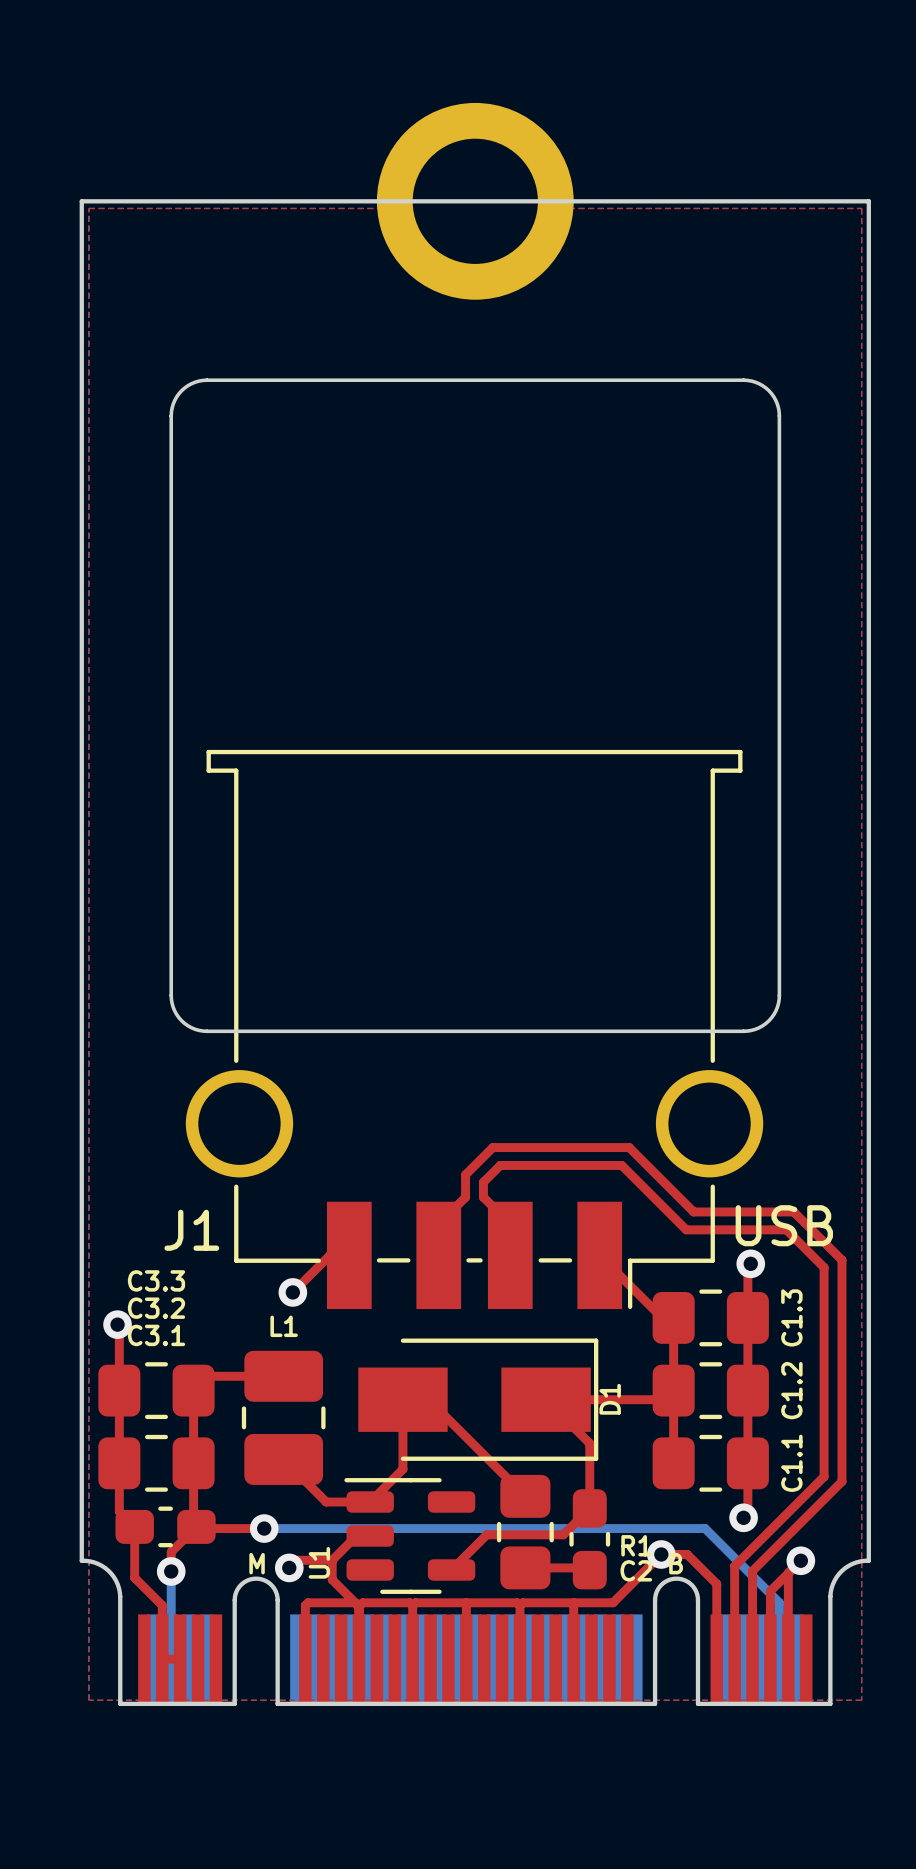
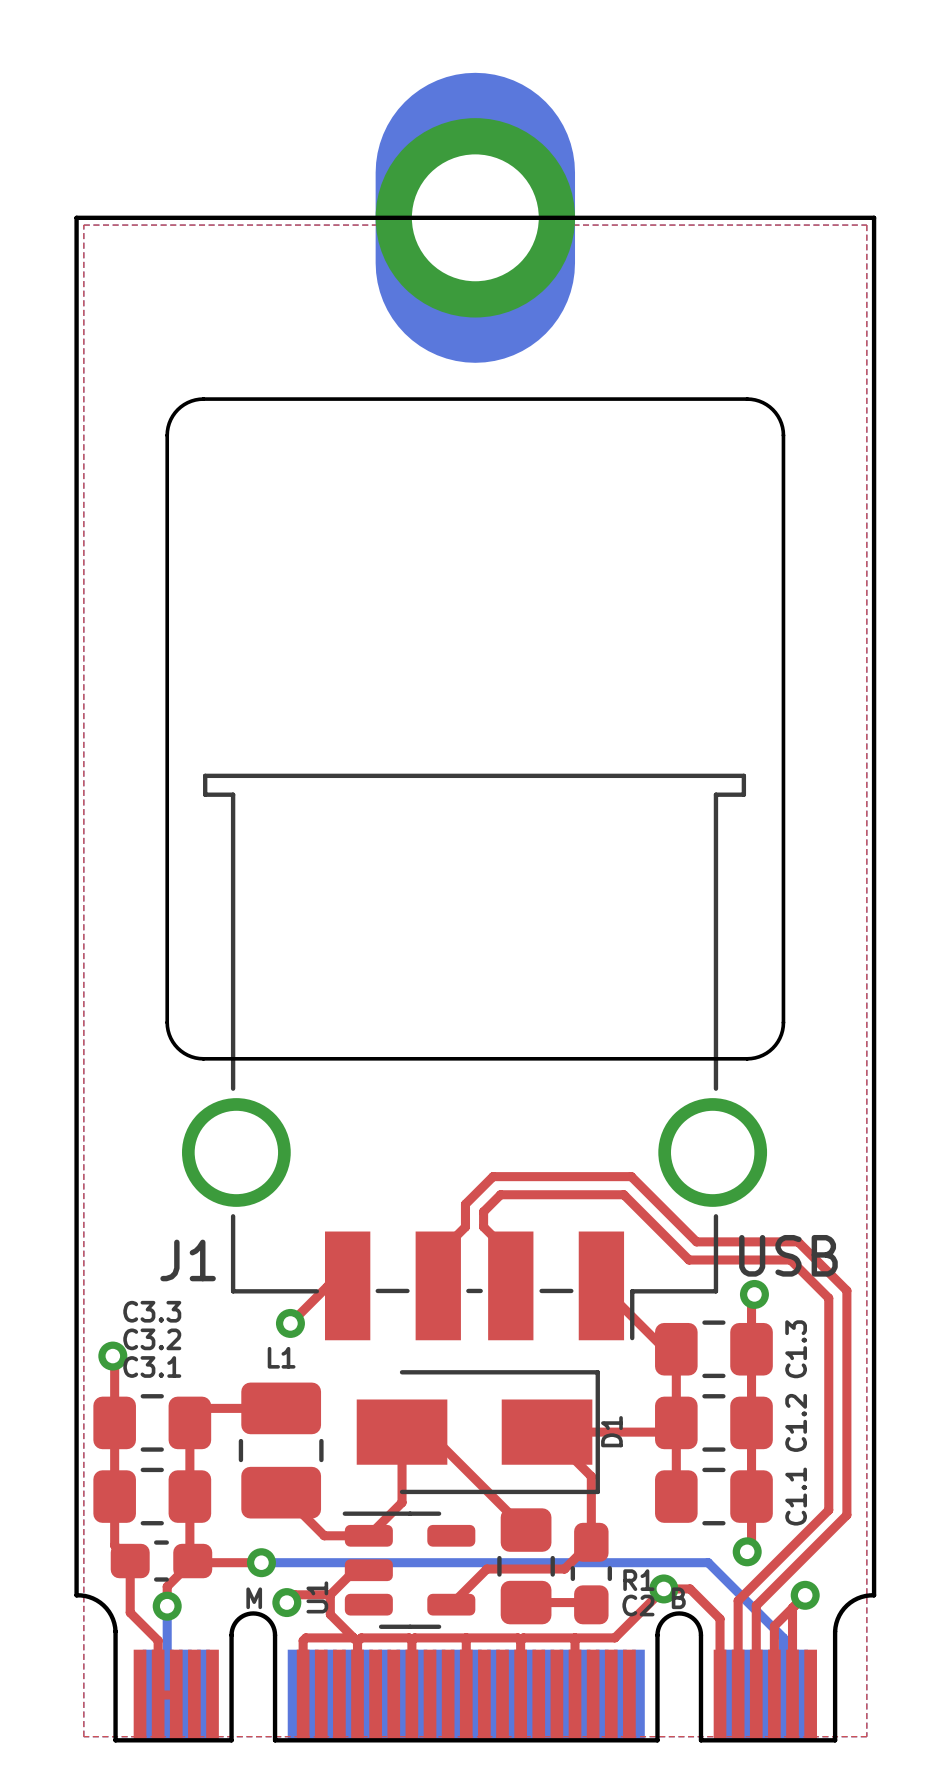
J1 footprint: [79, 102, 871, 1707] -> [74, 72, 877, 1743]

